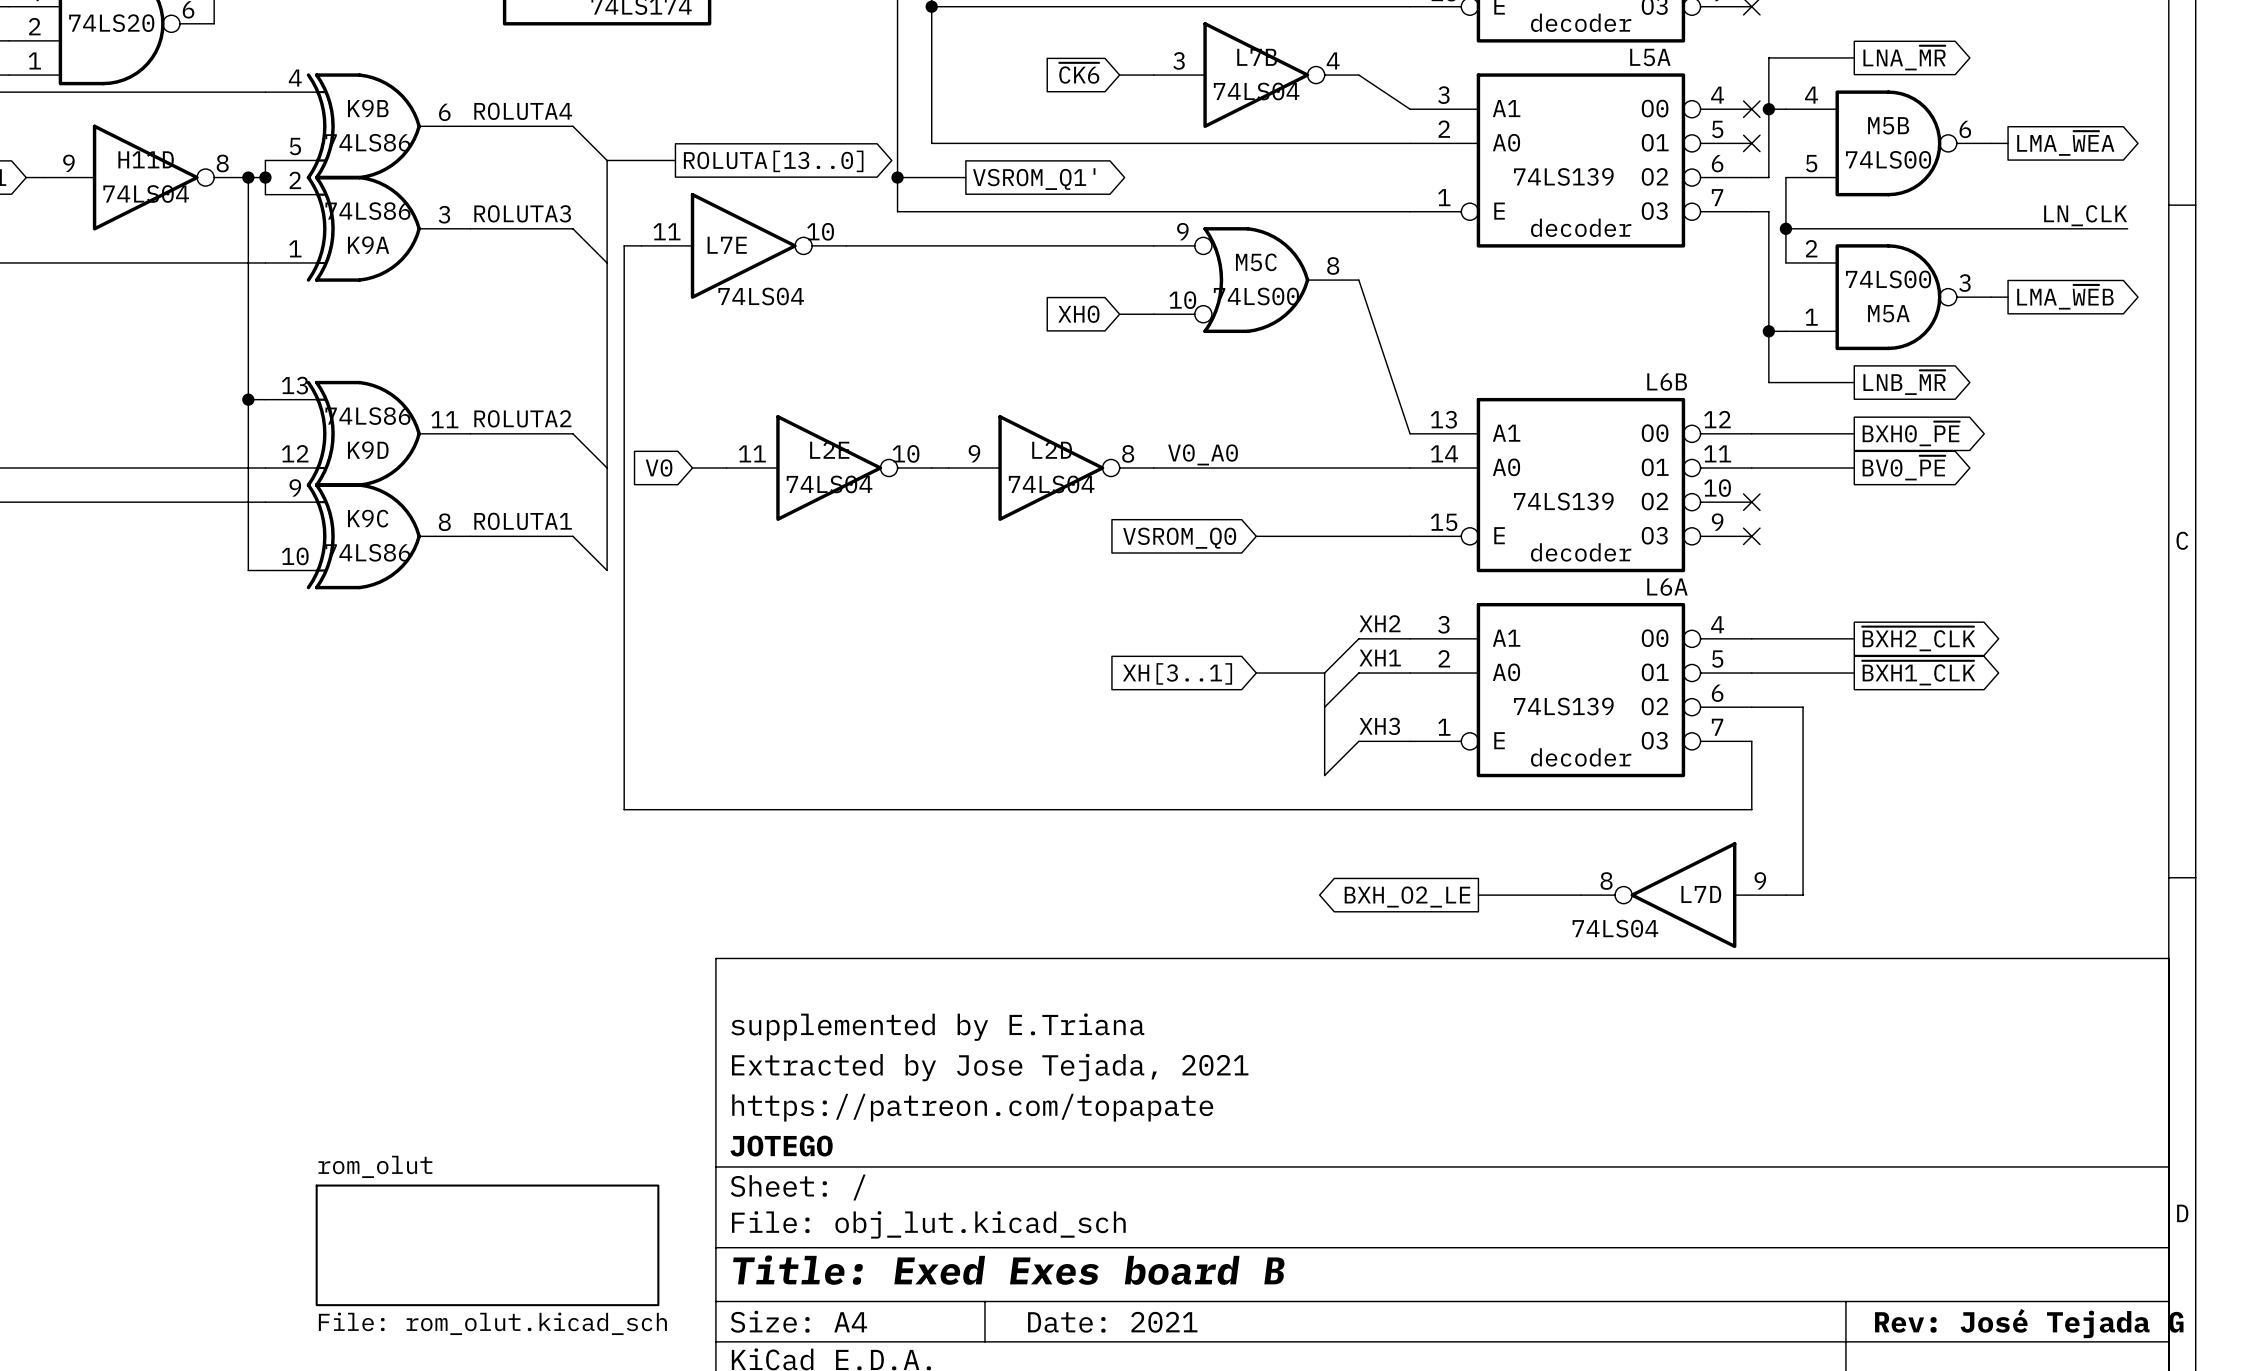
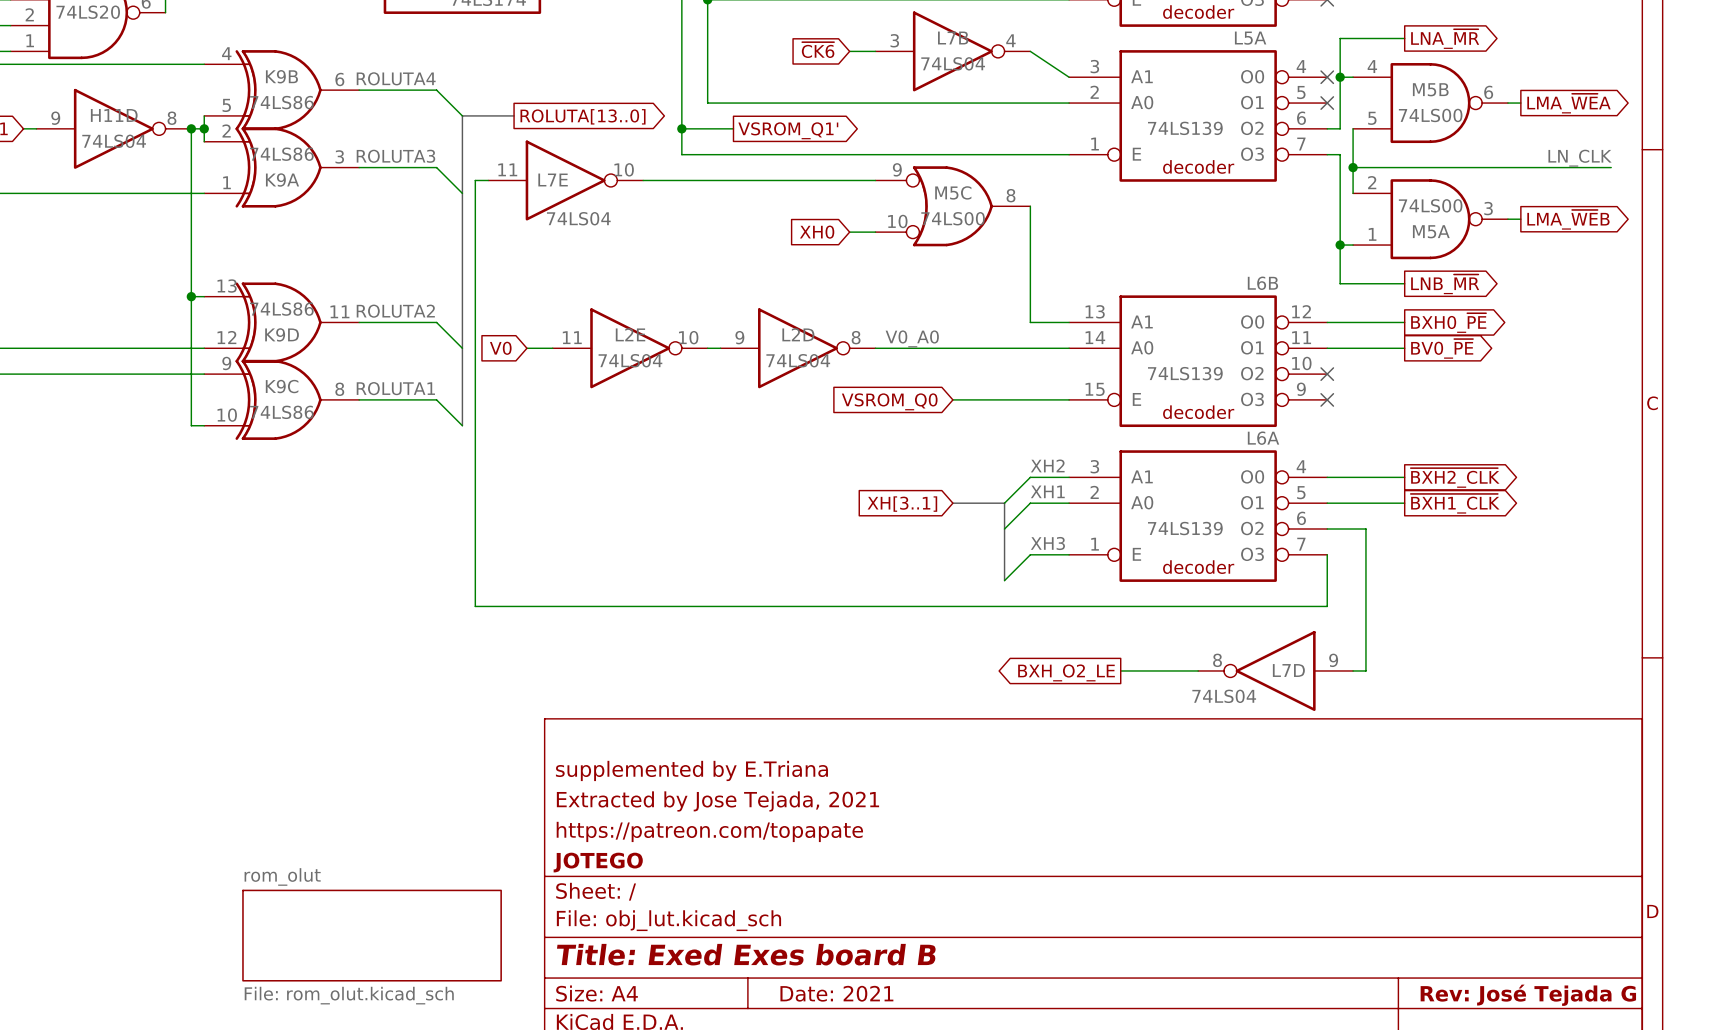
wire: (1358, 280) (1410, 433) -> (1030, 206) (1030, 322) (1069, 322)

